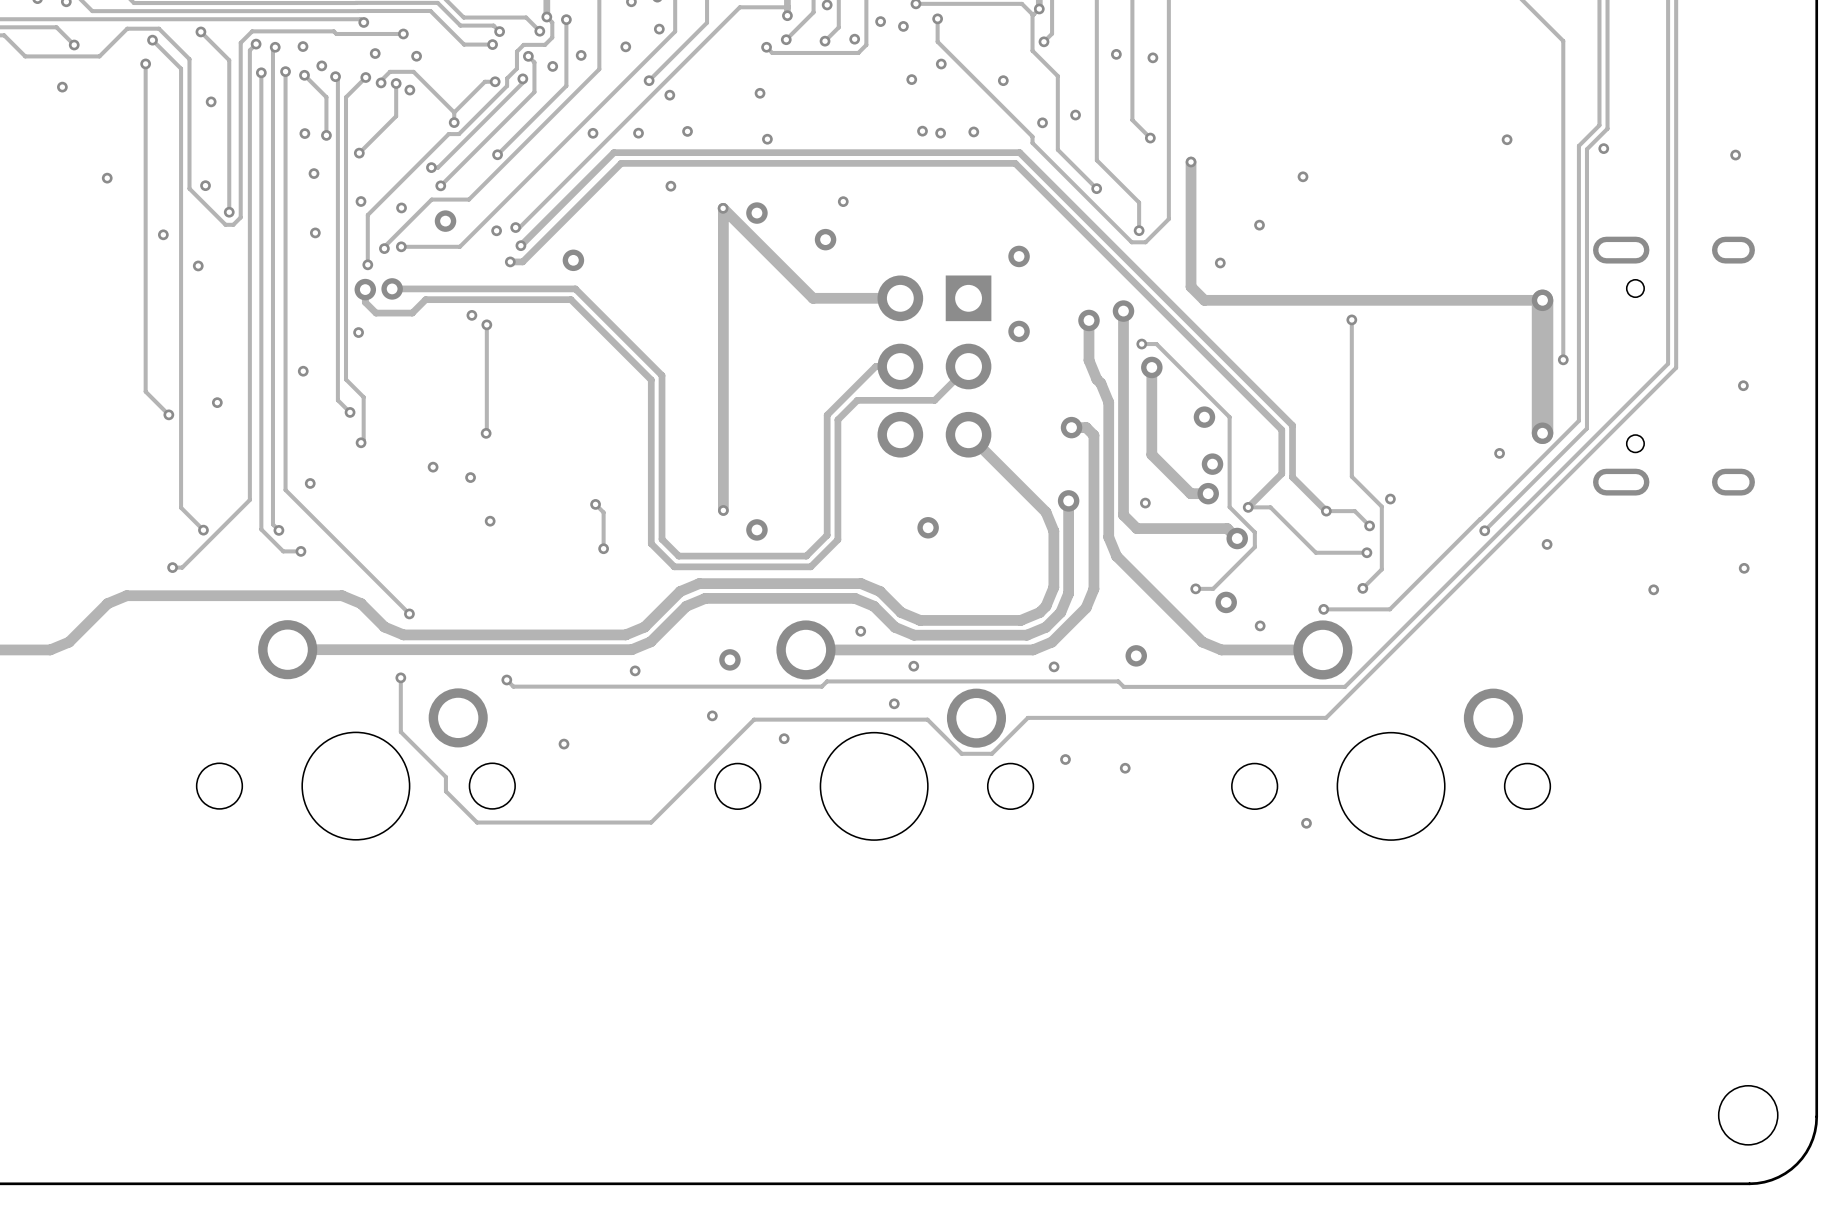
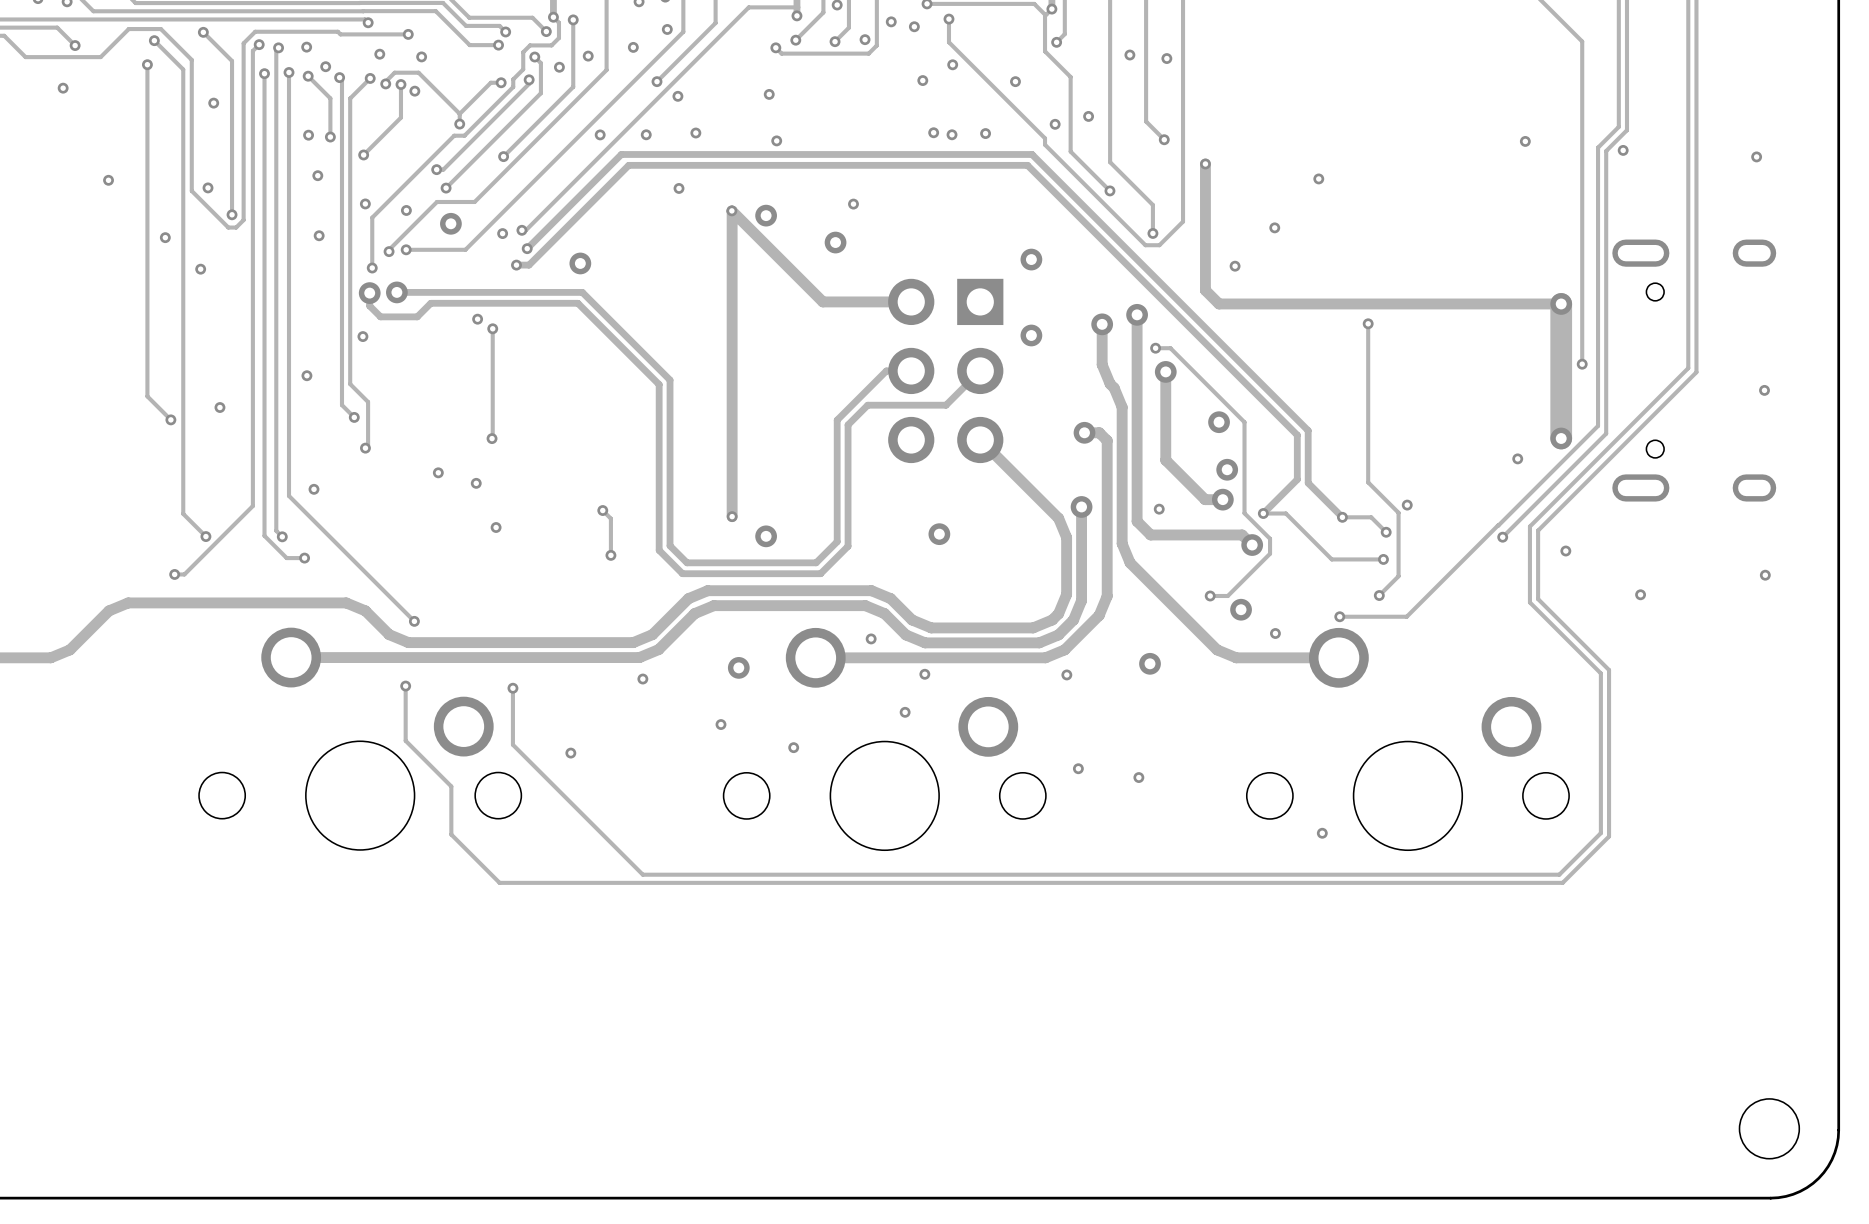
track: (1511, 520) (1344, 686) (1123, 686) (1118, 681) (827, 681) (821, 686) (513, 686) (506, 680) -> (1529, 526) (1529, 602) (1600, 673) (1600, 833) (1559, 874) (642, 874) (512, 744) (512, 688)
track: (1519, 524) (1326, 717) (1027, 717) (991, 753) (961, 753) (927, 719) (754, 719) (651, 822) (477, 822) (445, 791) -> (1538, 530) (1538, 599) (1609, 670) (1609, 836) (1562, 882) (499, 882) (451, 834) (451, 800)
via position: (1653, 589) -> (1640, 594)

